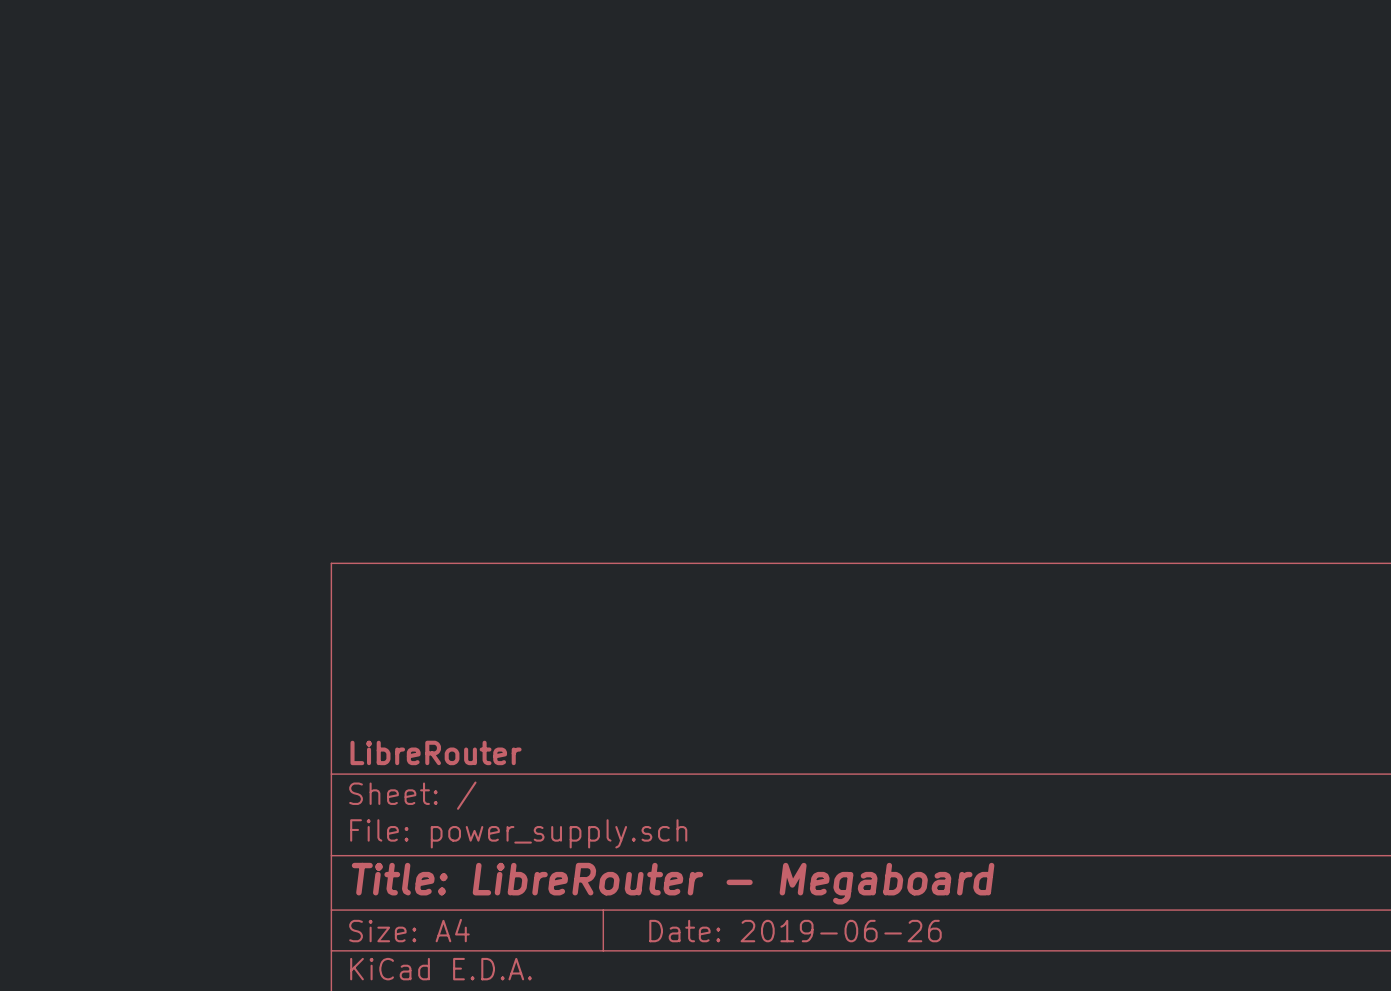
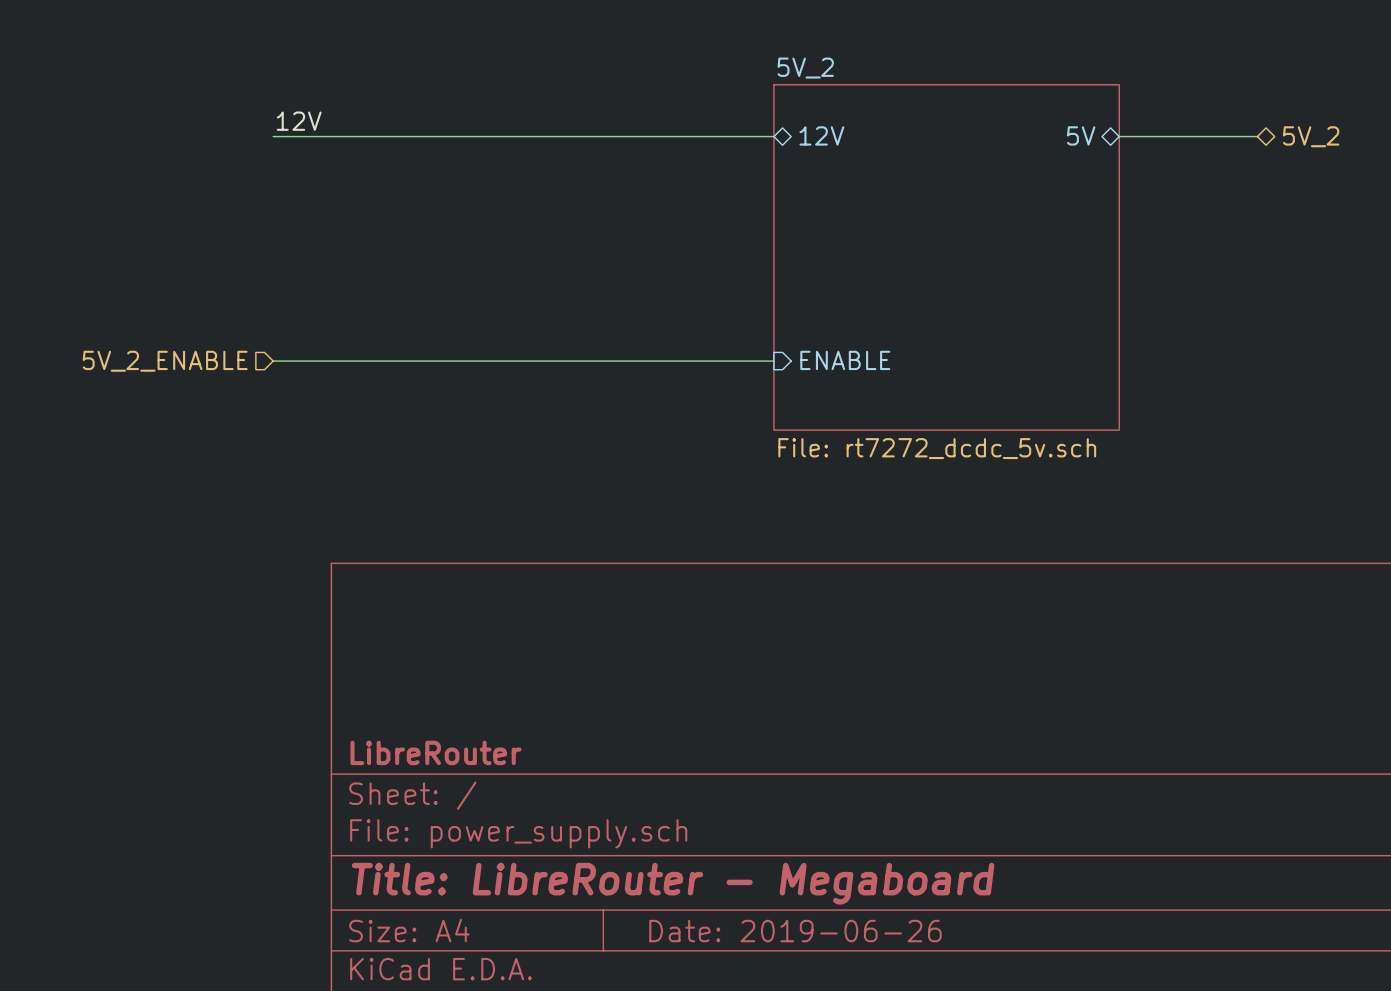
label: none -> 12V (299, 121)
sheet pin: none -> 12V (821, 135)
sheet pin: none -> 5V (1081, 135)
wire: none -> (273, 136) (773, 136)
wire: none -> (1119, 136) (1257, 136)
hierarchical label: none -> 5V_2 (1311, 136)
sheet 5V_2: none -> File: rt7272_dcdc_5v.sch (946, 257)
sheet pin: none -> ENABLE (845, 360)
hierarchical label: none -> 5V_2_ENABLE (165, 361)
wire: none -> (273, 361) (773, 361)

